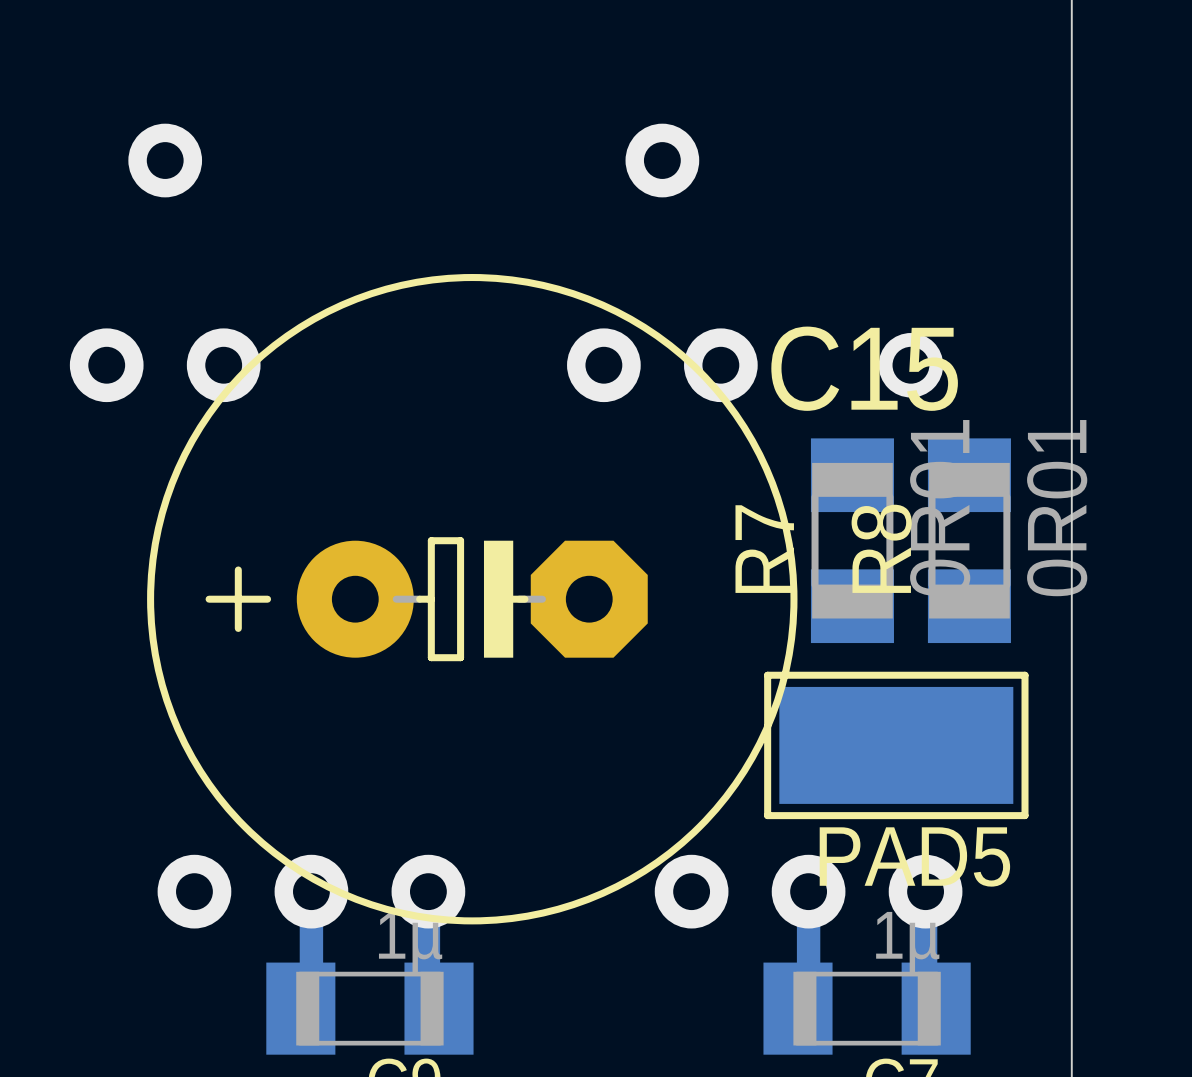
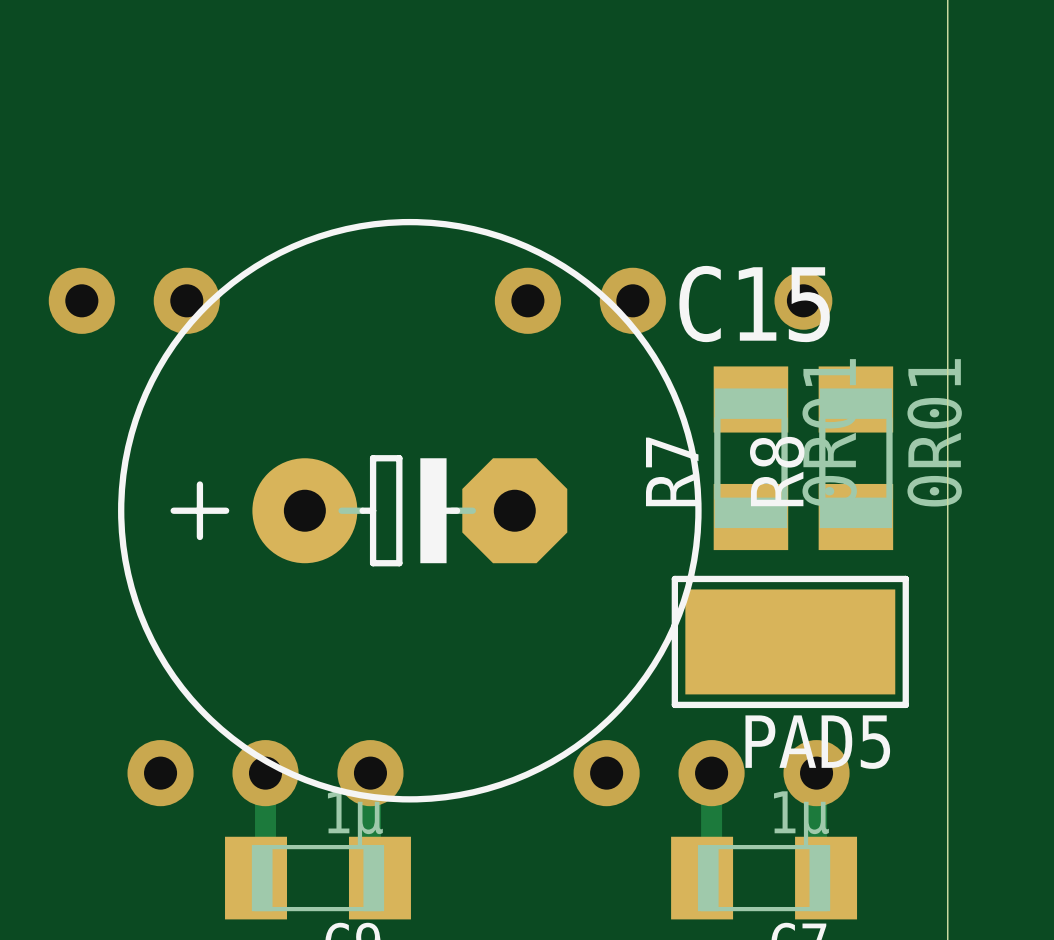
via: (165, 160) -> none
via: (662, 160) -> none

